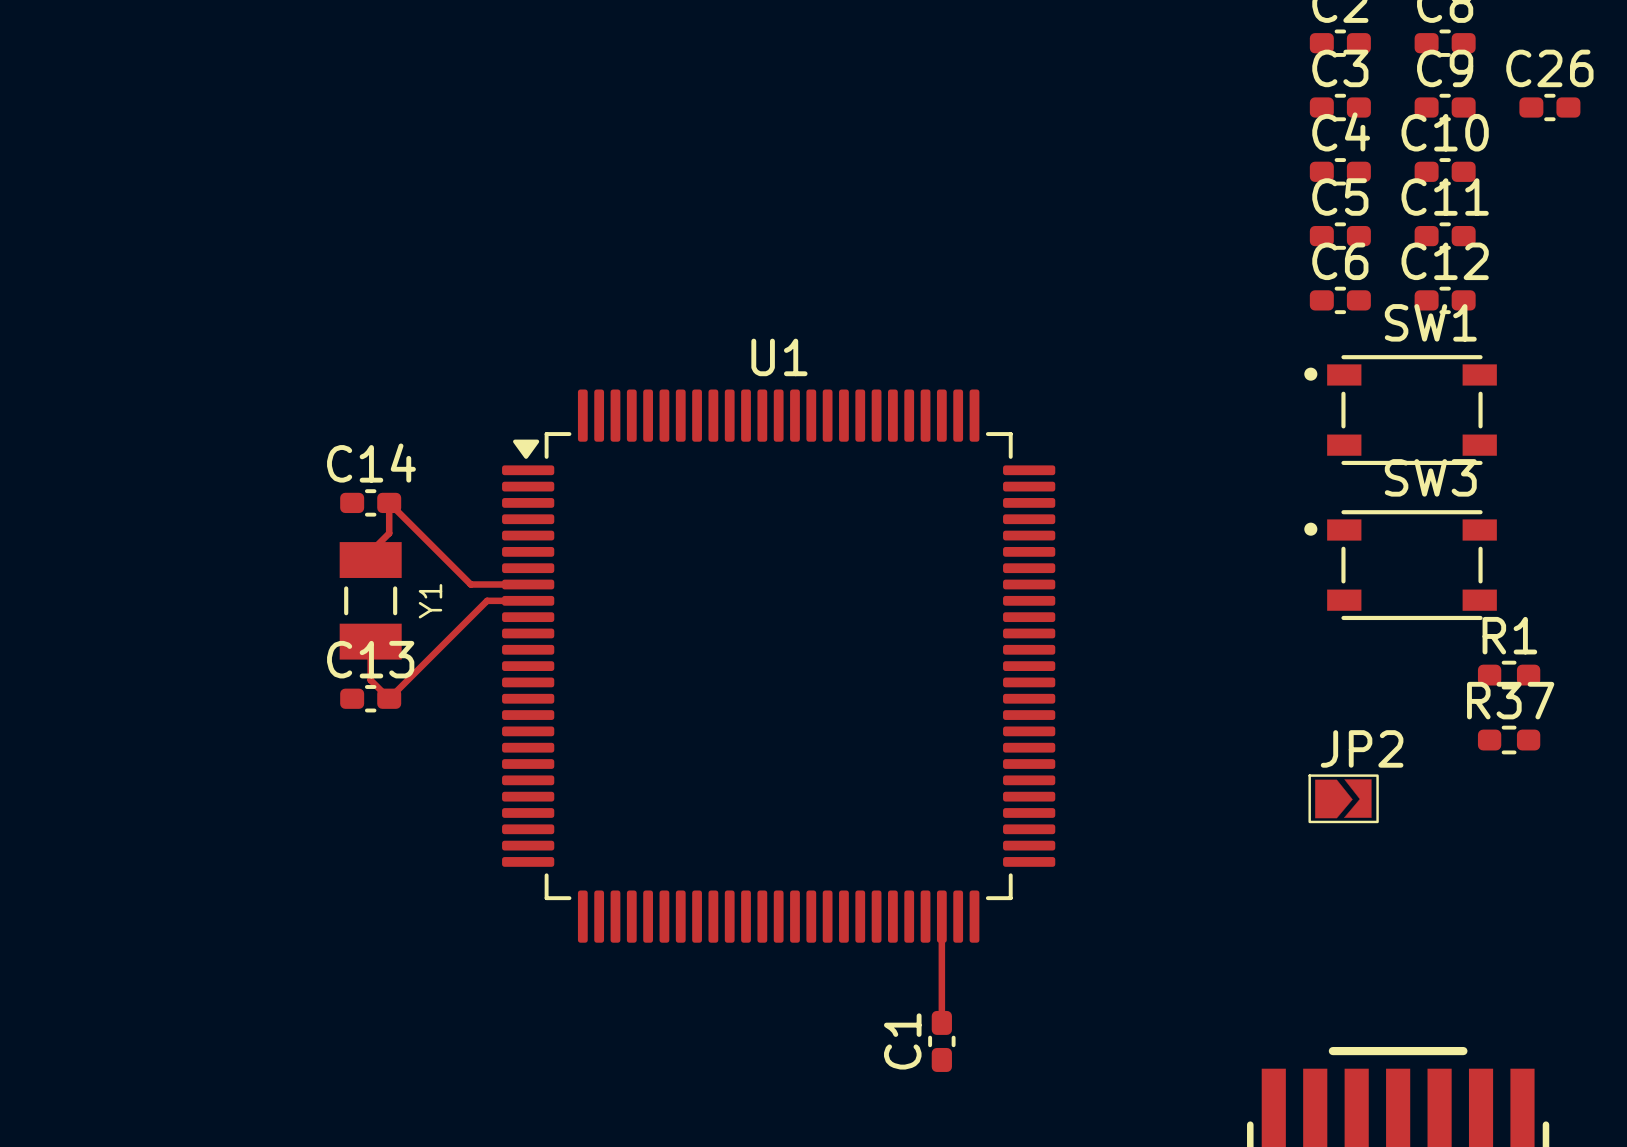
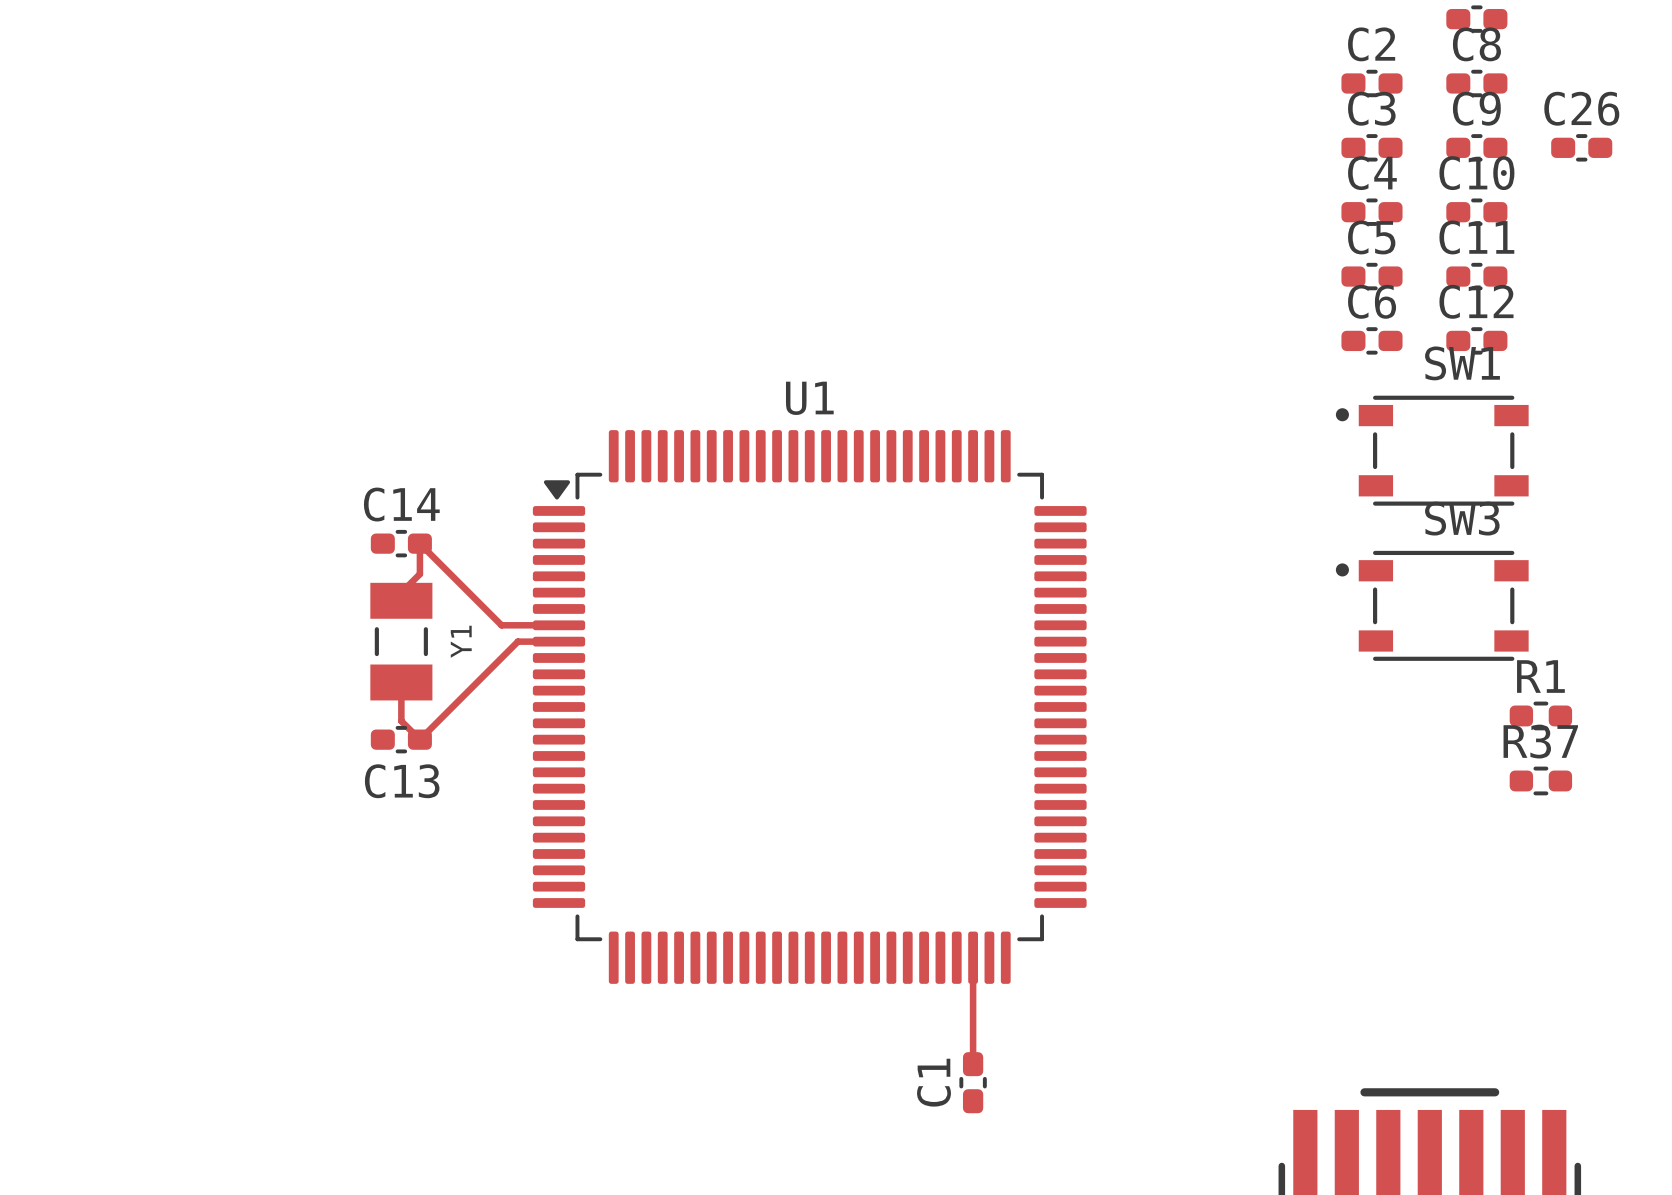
C13 name position: C13 (370, 659) -> C13 (402, 781)
JP2: (1343, 798) -> none

